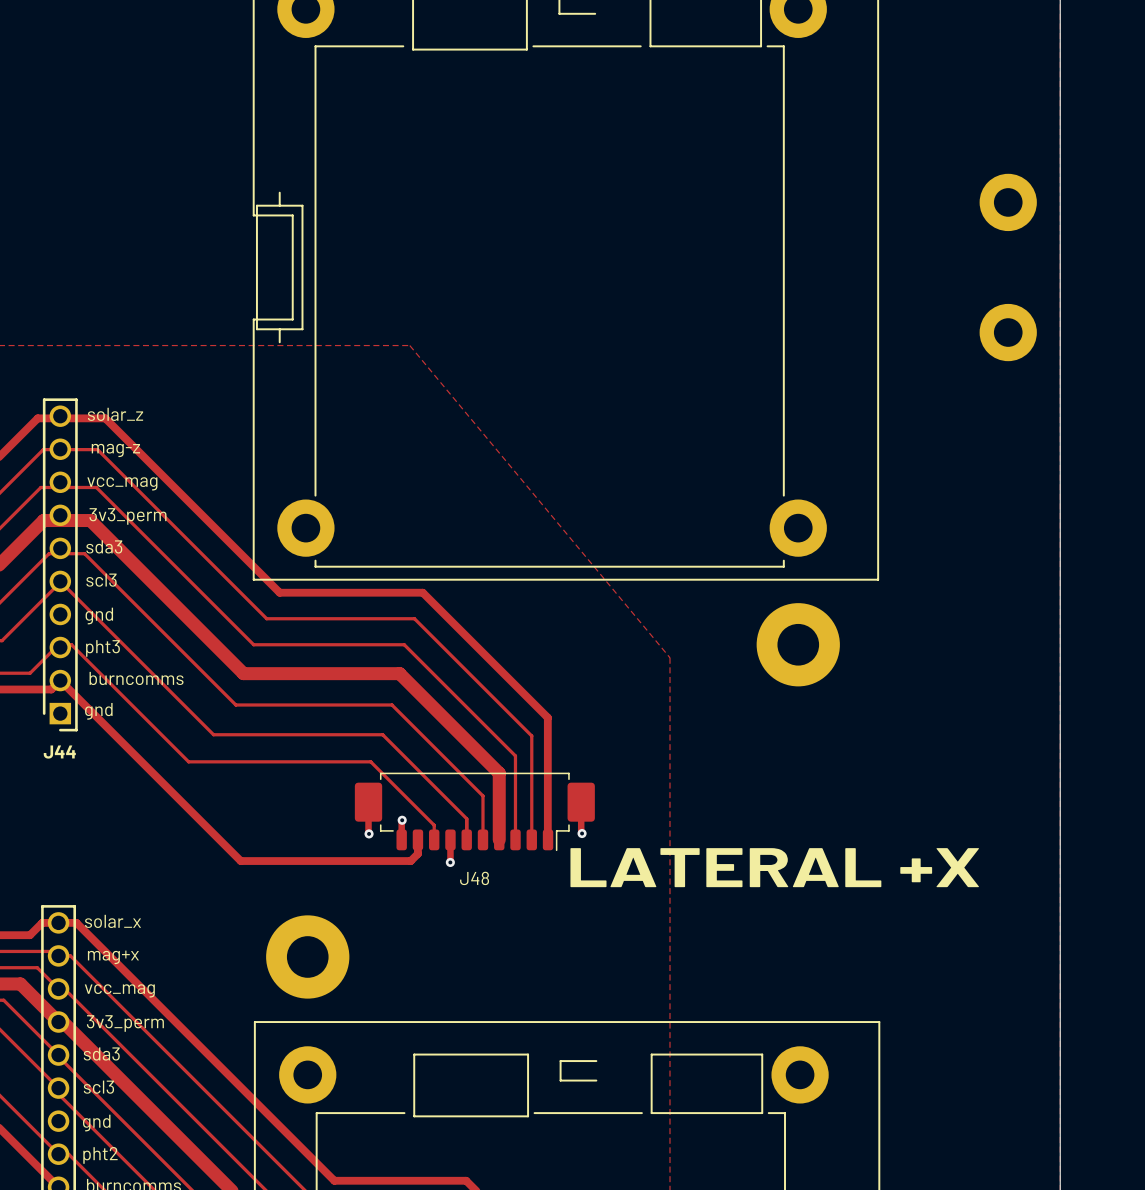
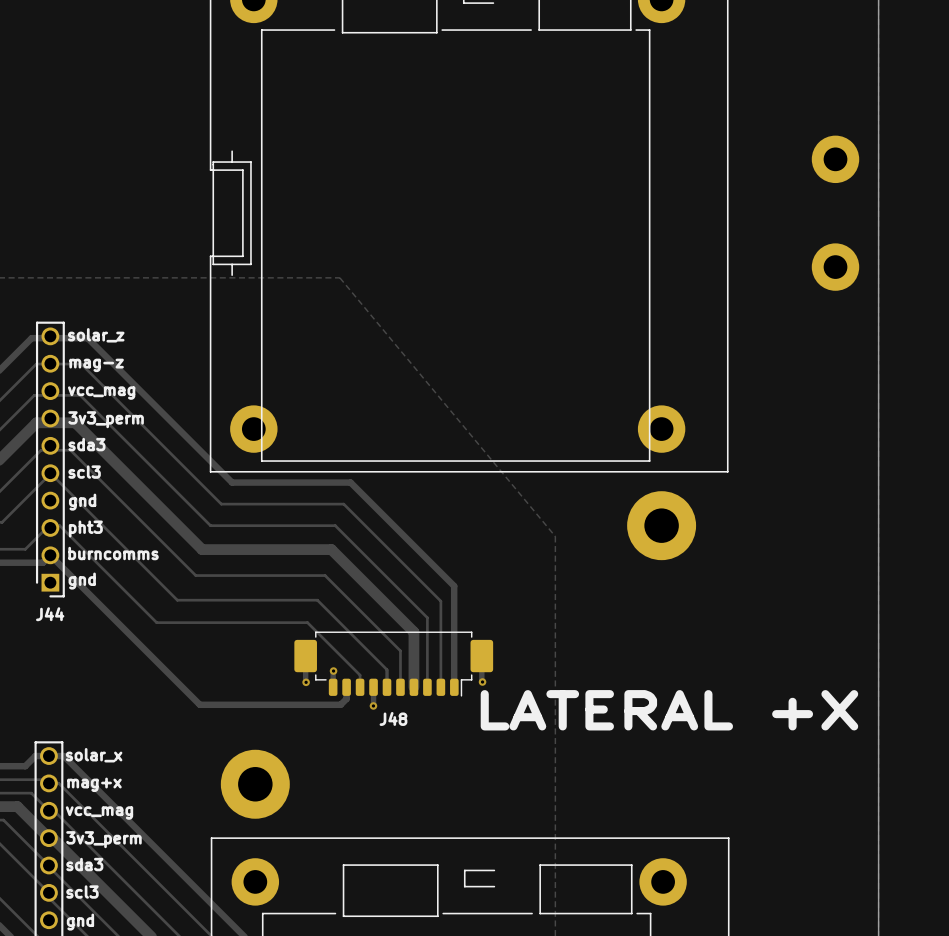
line: none -> (261, 402) (261, 456)
line: none -> (649, 402) (649, 456)

